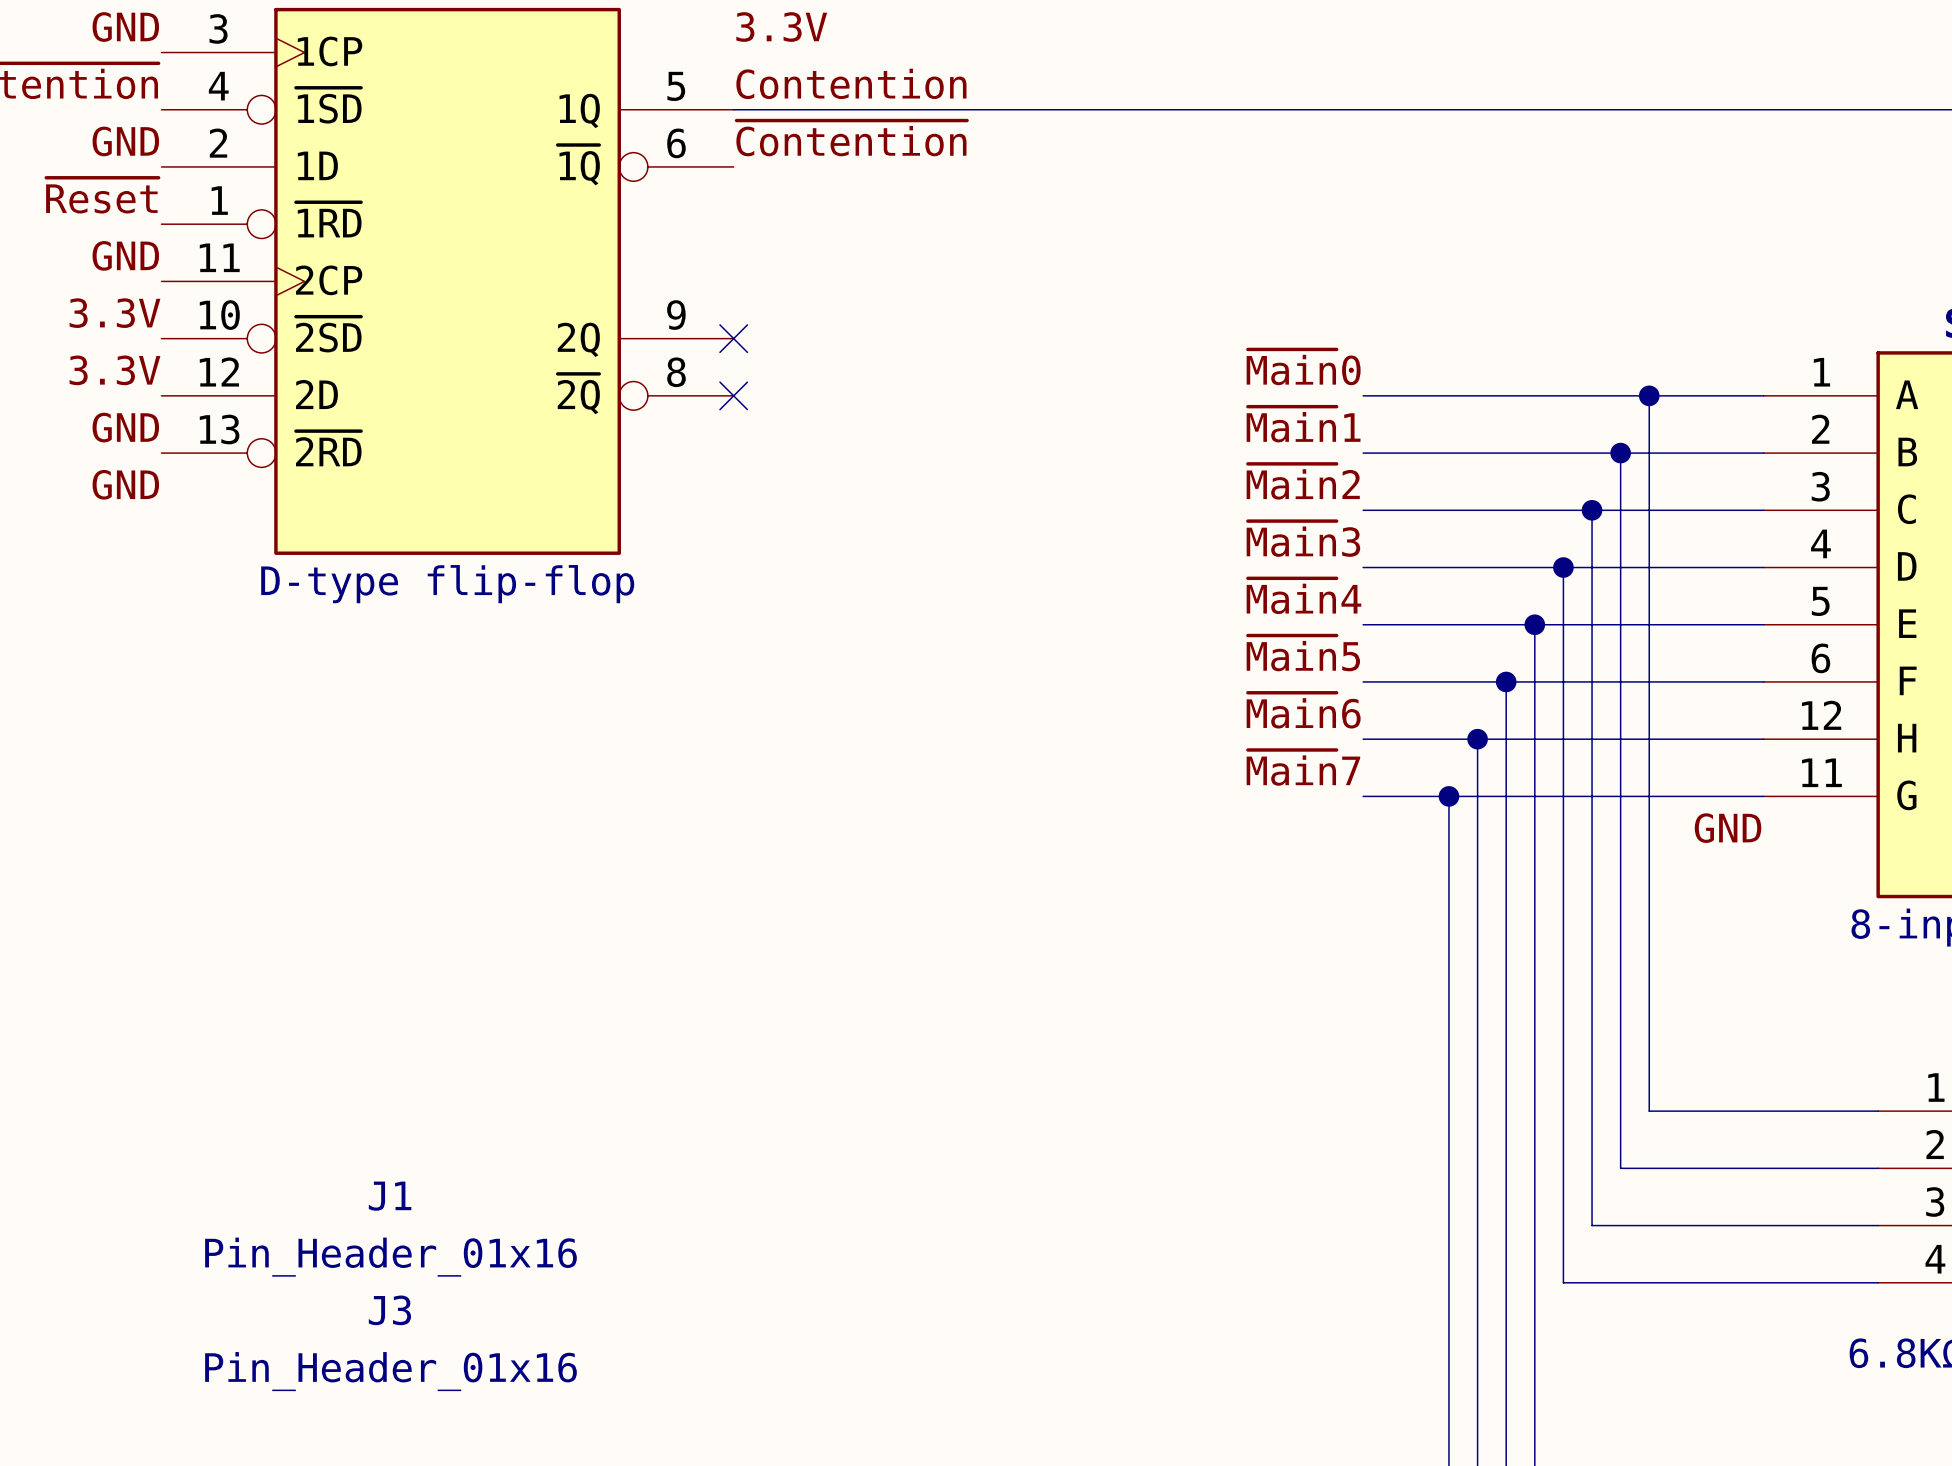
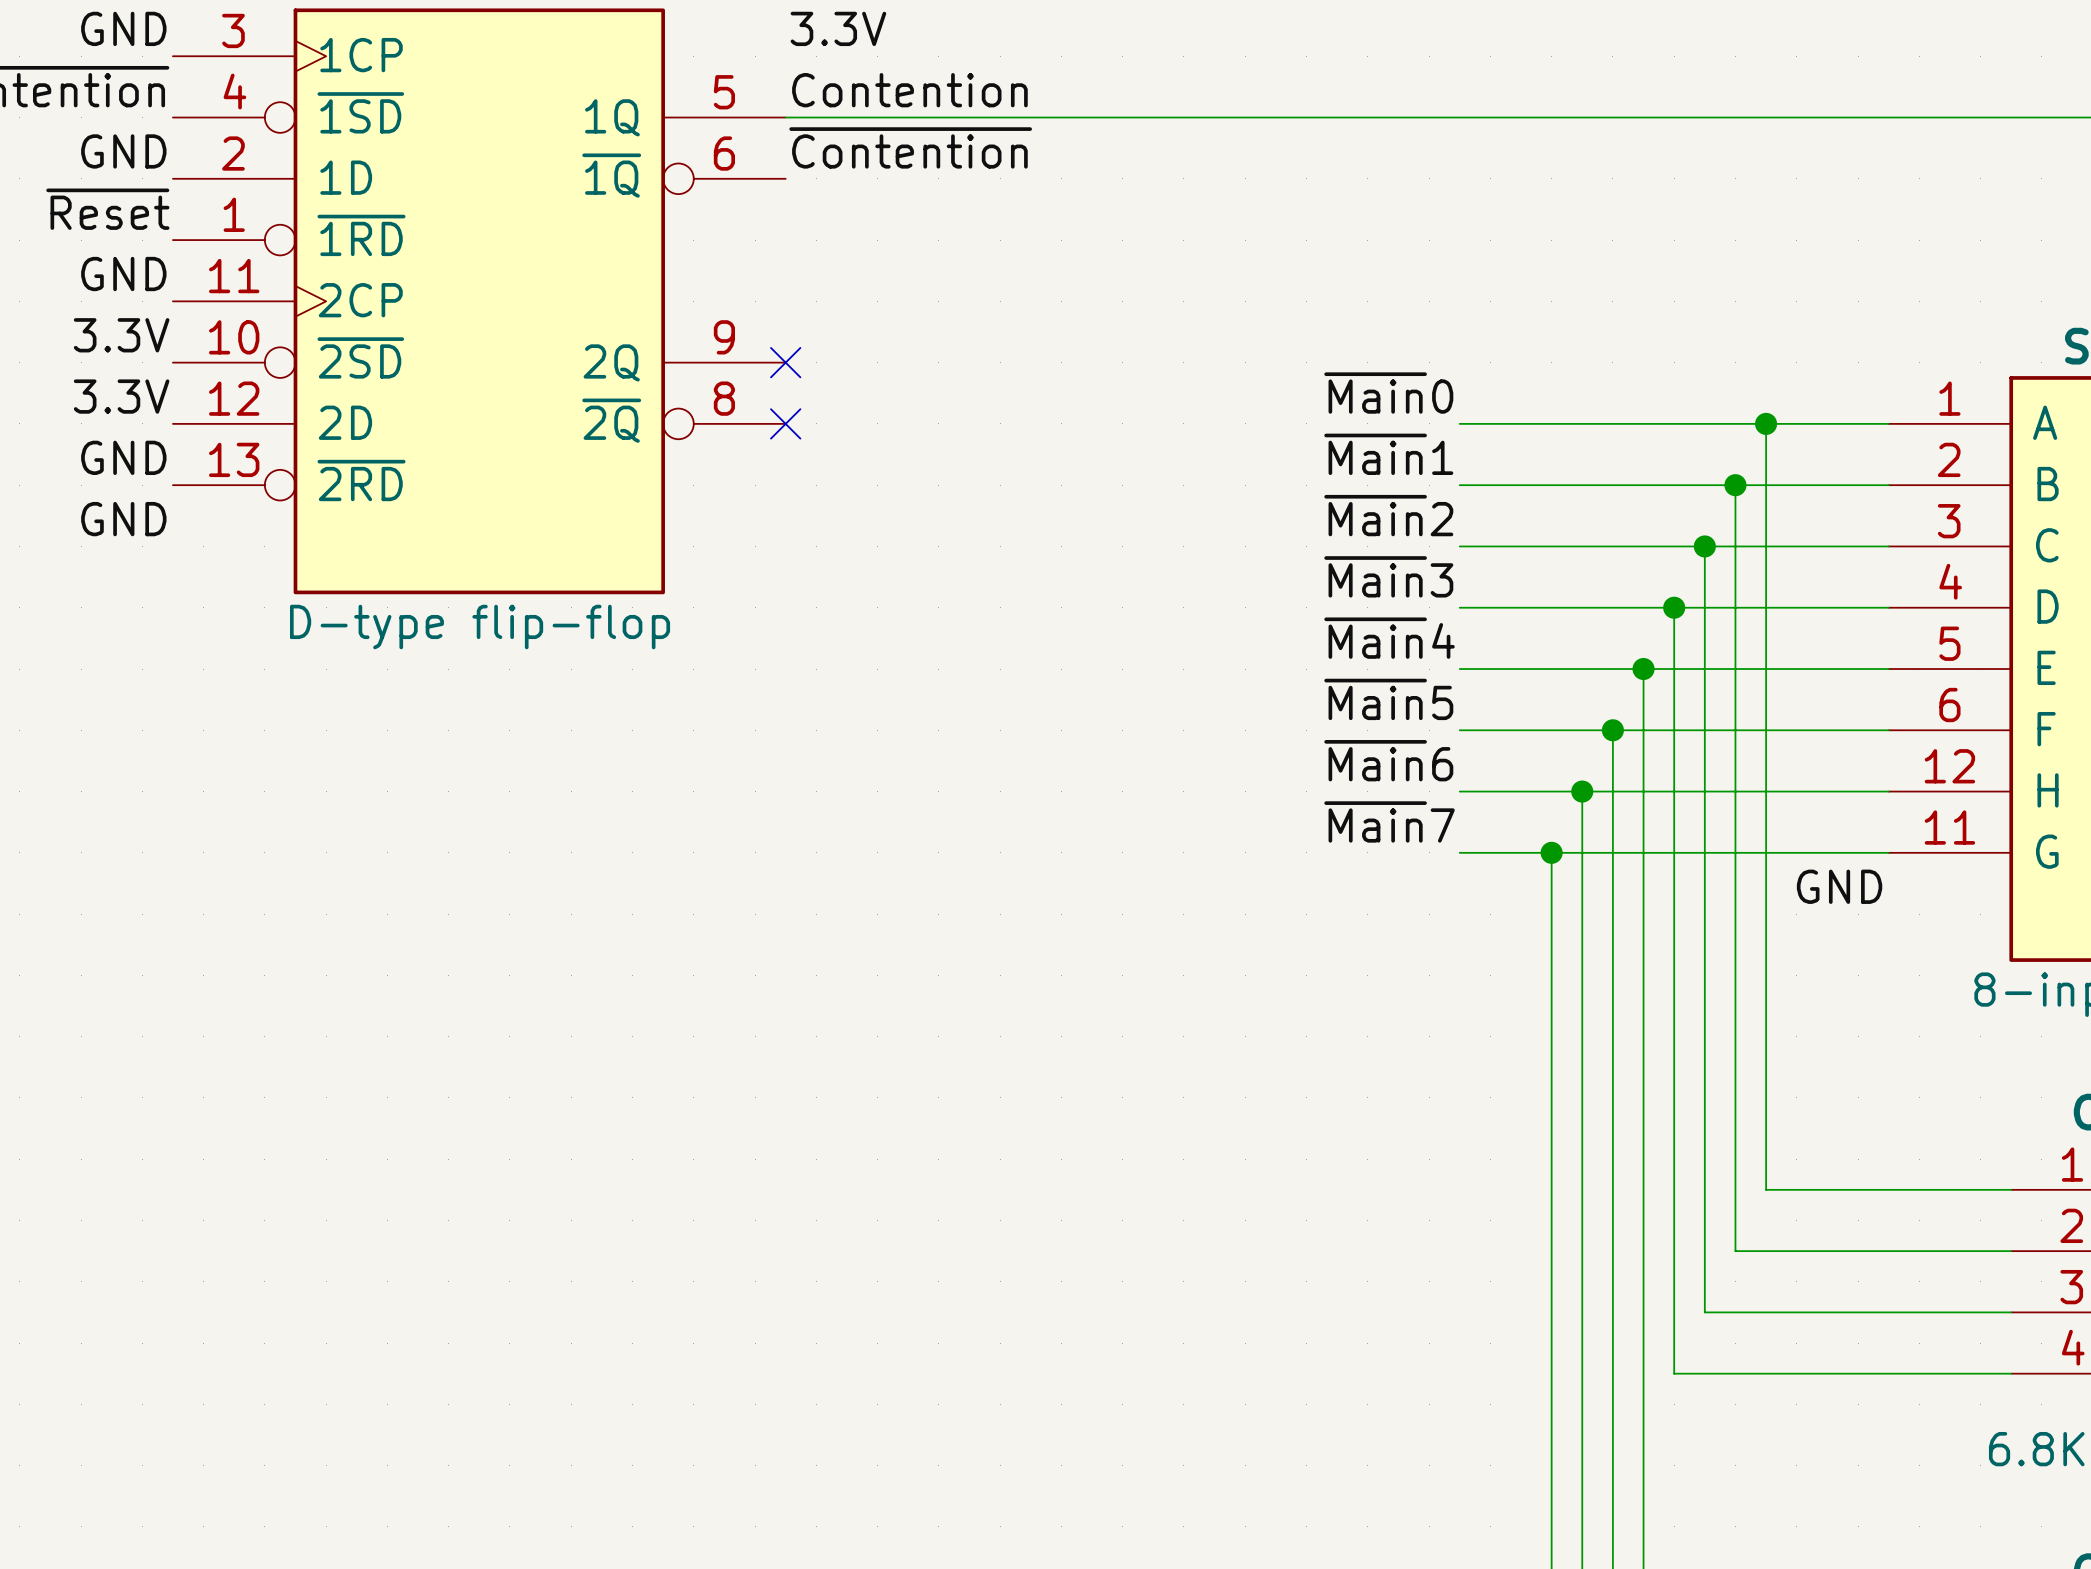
J1: Pin_Header_01x16 (390, 1229) -> none
J3: Pin_Header_01x16 (390, 1343) -> none

